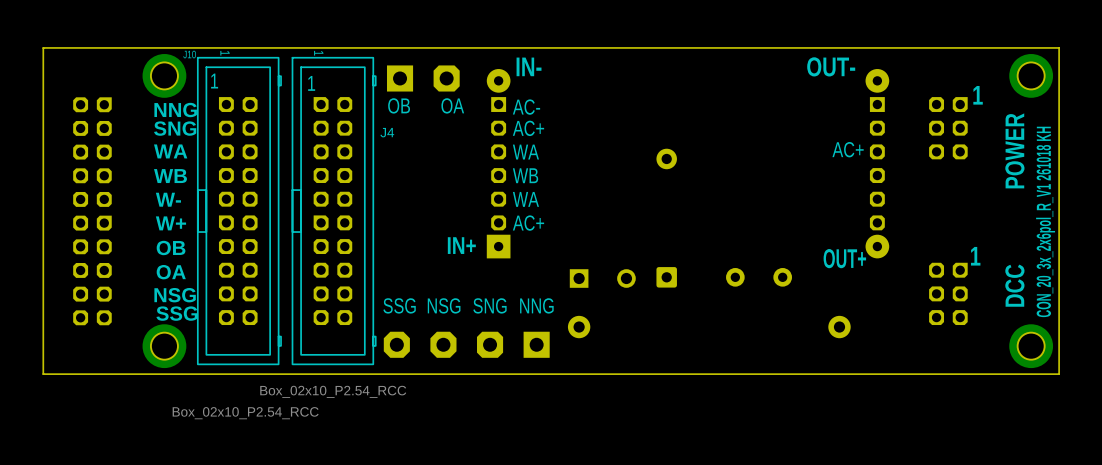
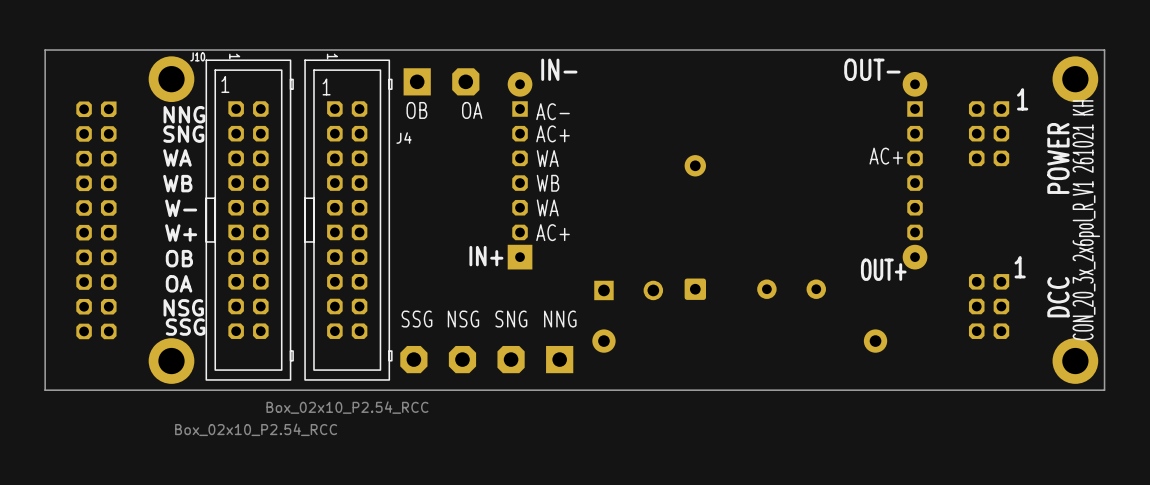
text: CON_20_3x_2x6pol_R_V1 261018 KH (1045, 221) -> CON_20_3x_2x6pol_R_V1 261021 KH (1086, 220)

